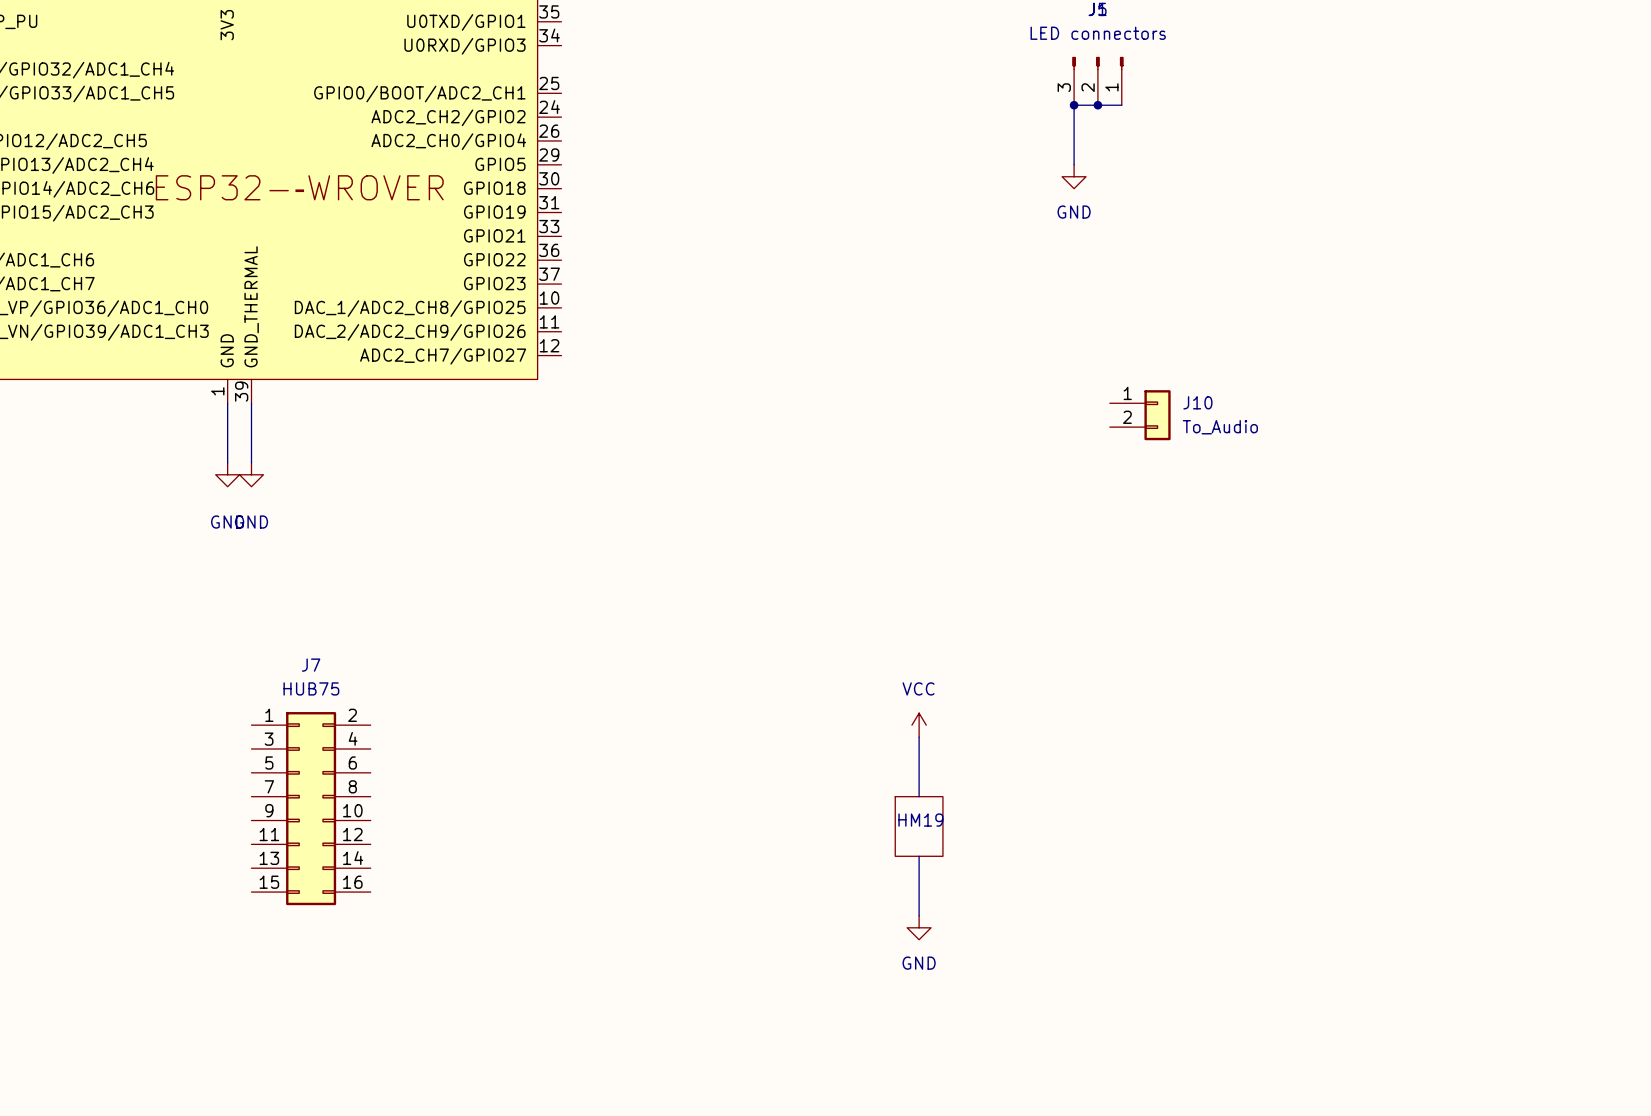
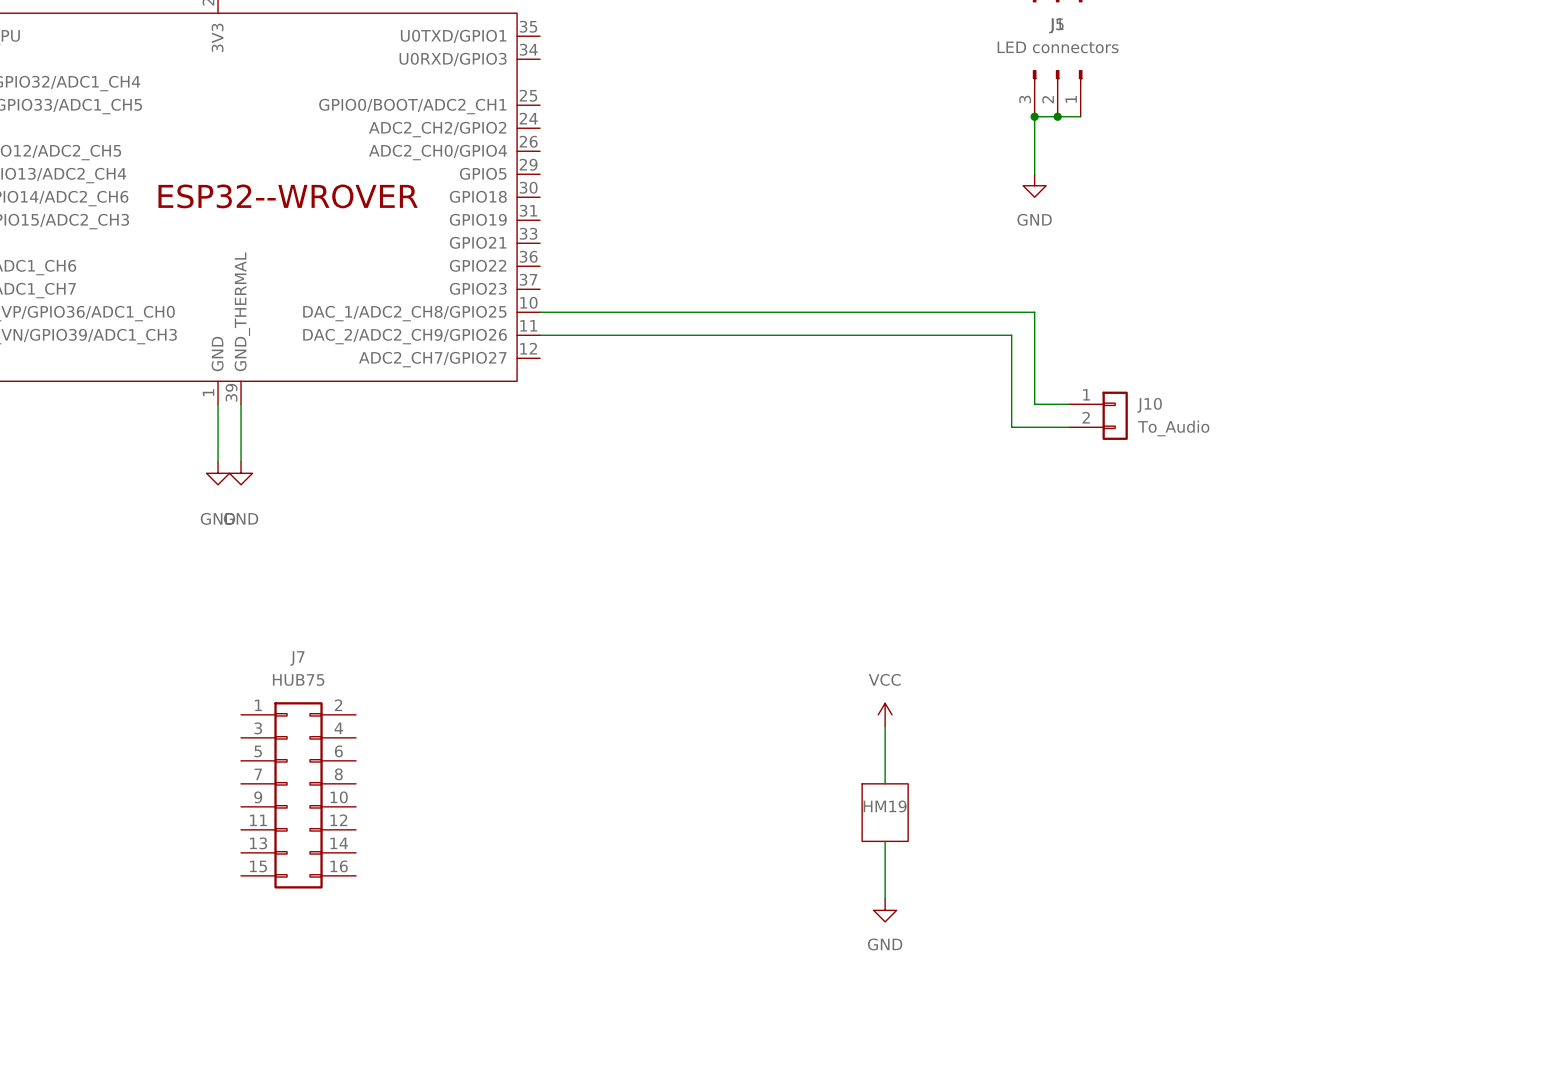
wire: none -> (540, 312) (1034, 312) (1034, 404) (1069, 404)
wire: none -> (540, 335) (1011, 335) (1011, 427) (1069, 427)

